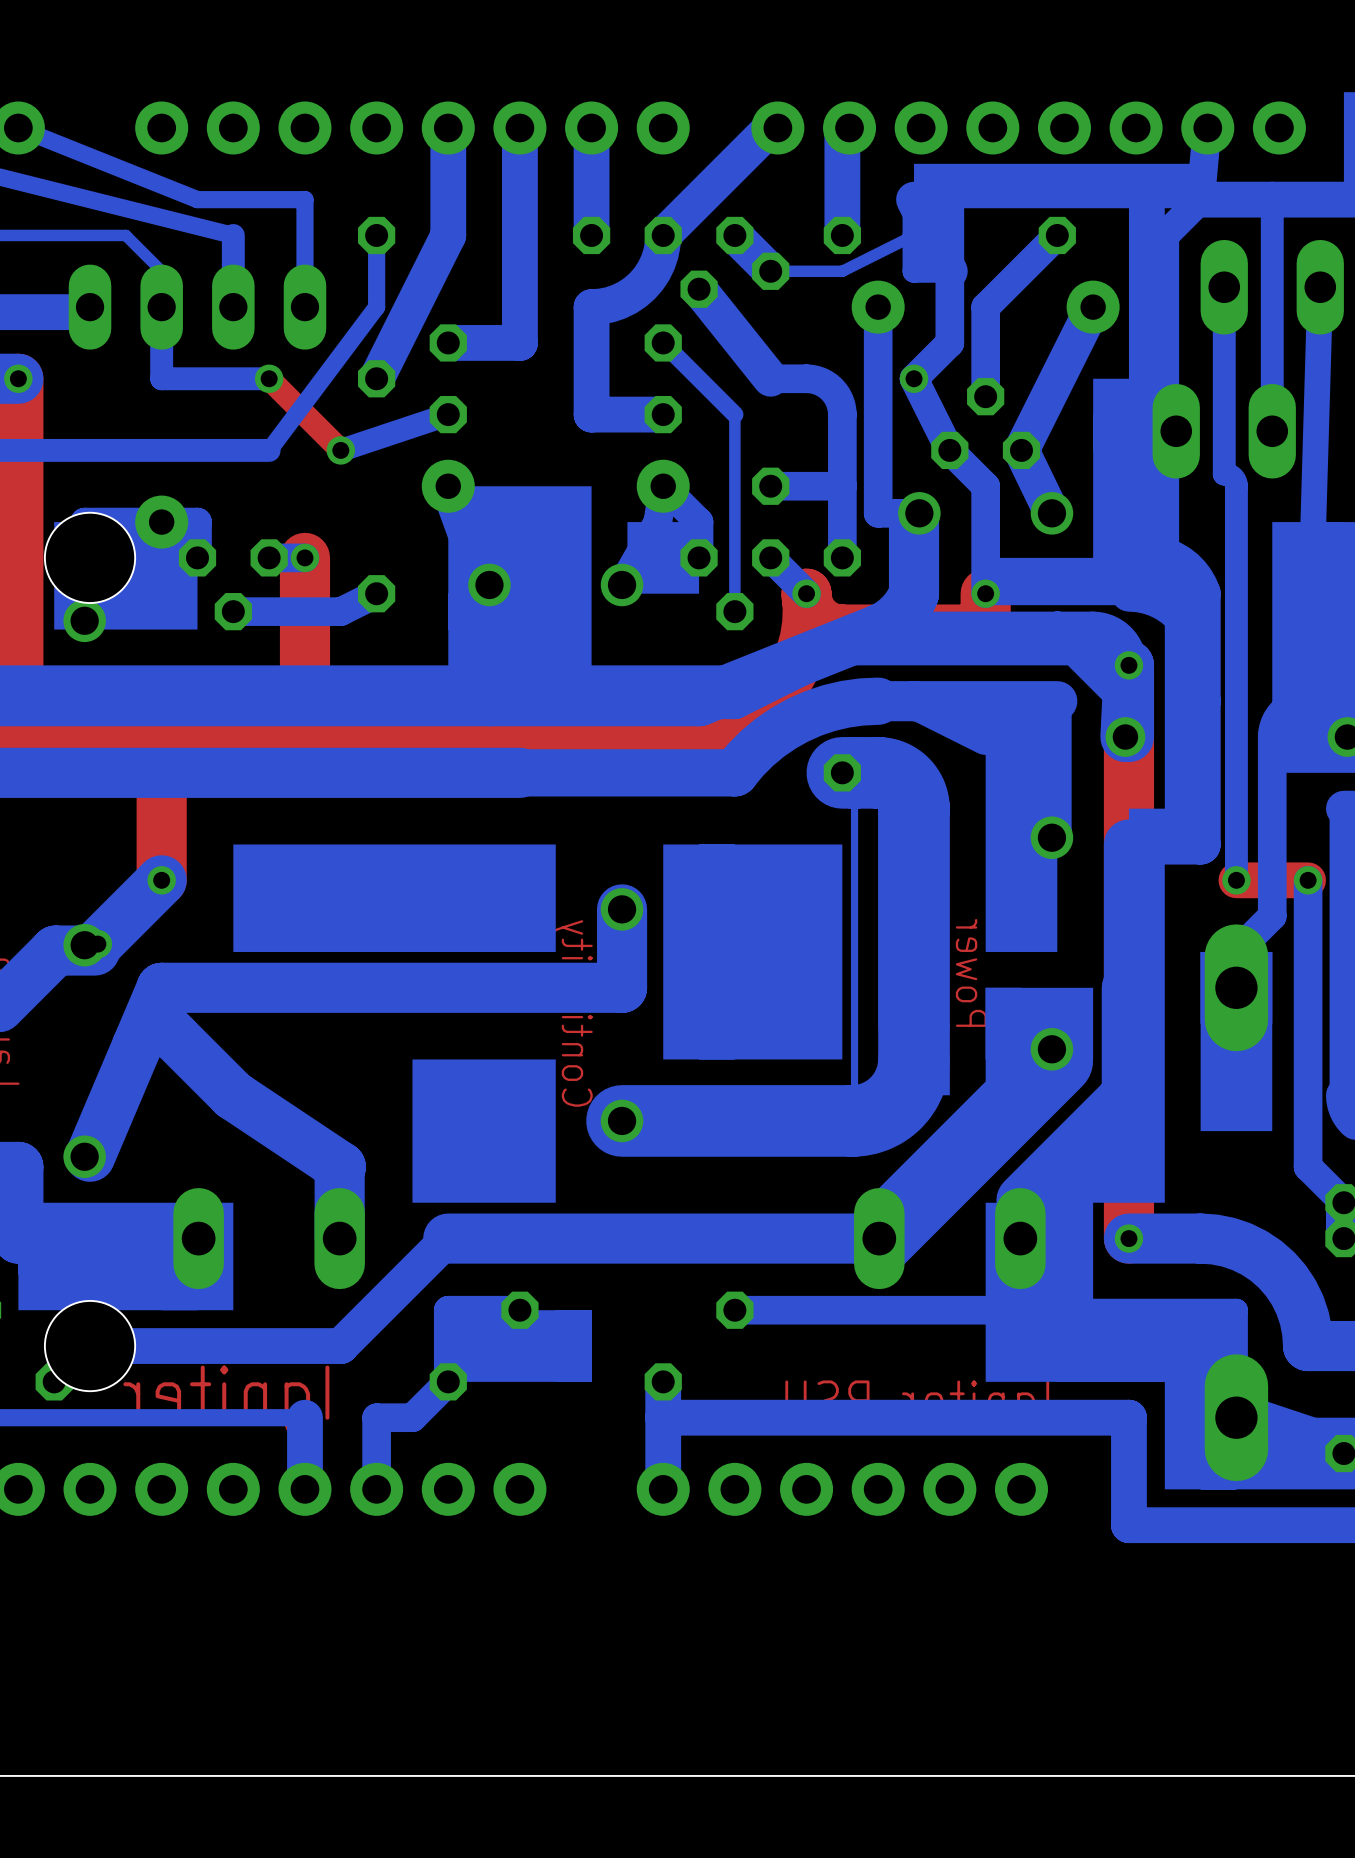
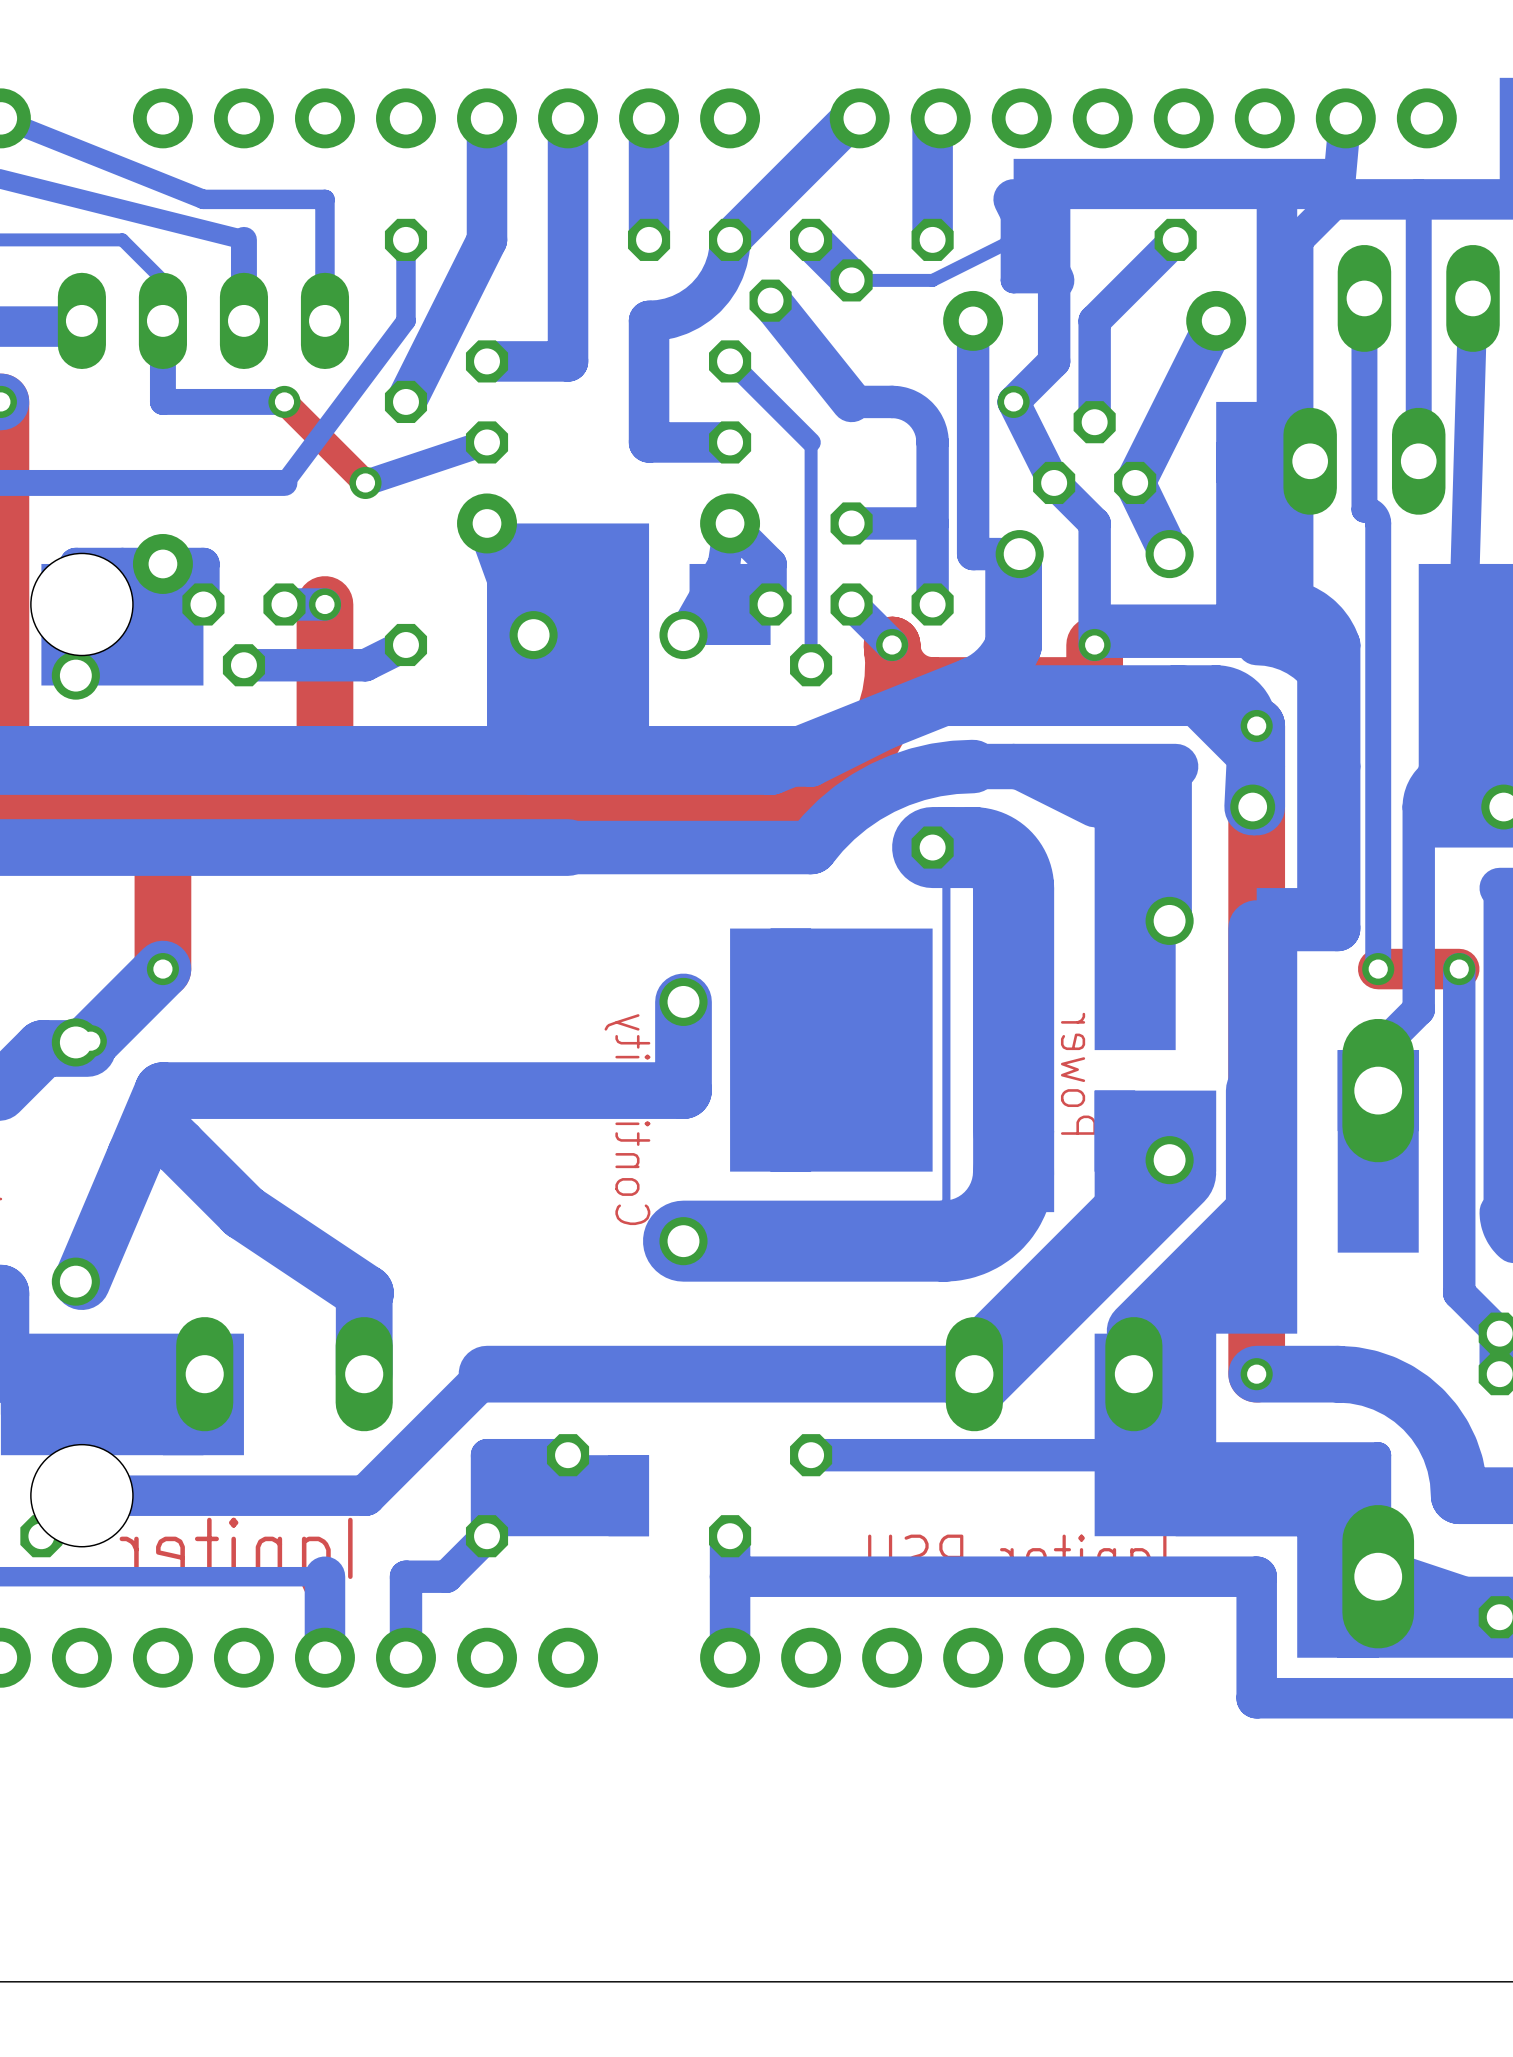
drawing: [233, 844, 556, 952] -> none
drawing: [412, 1059, 556, 1203] -> none

